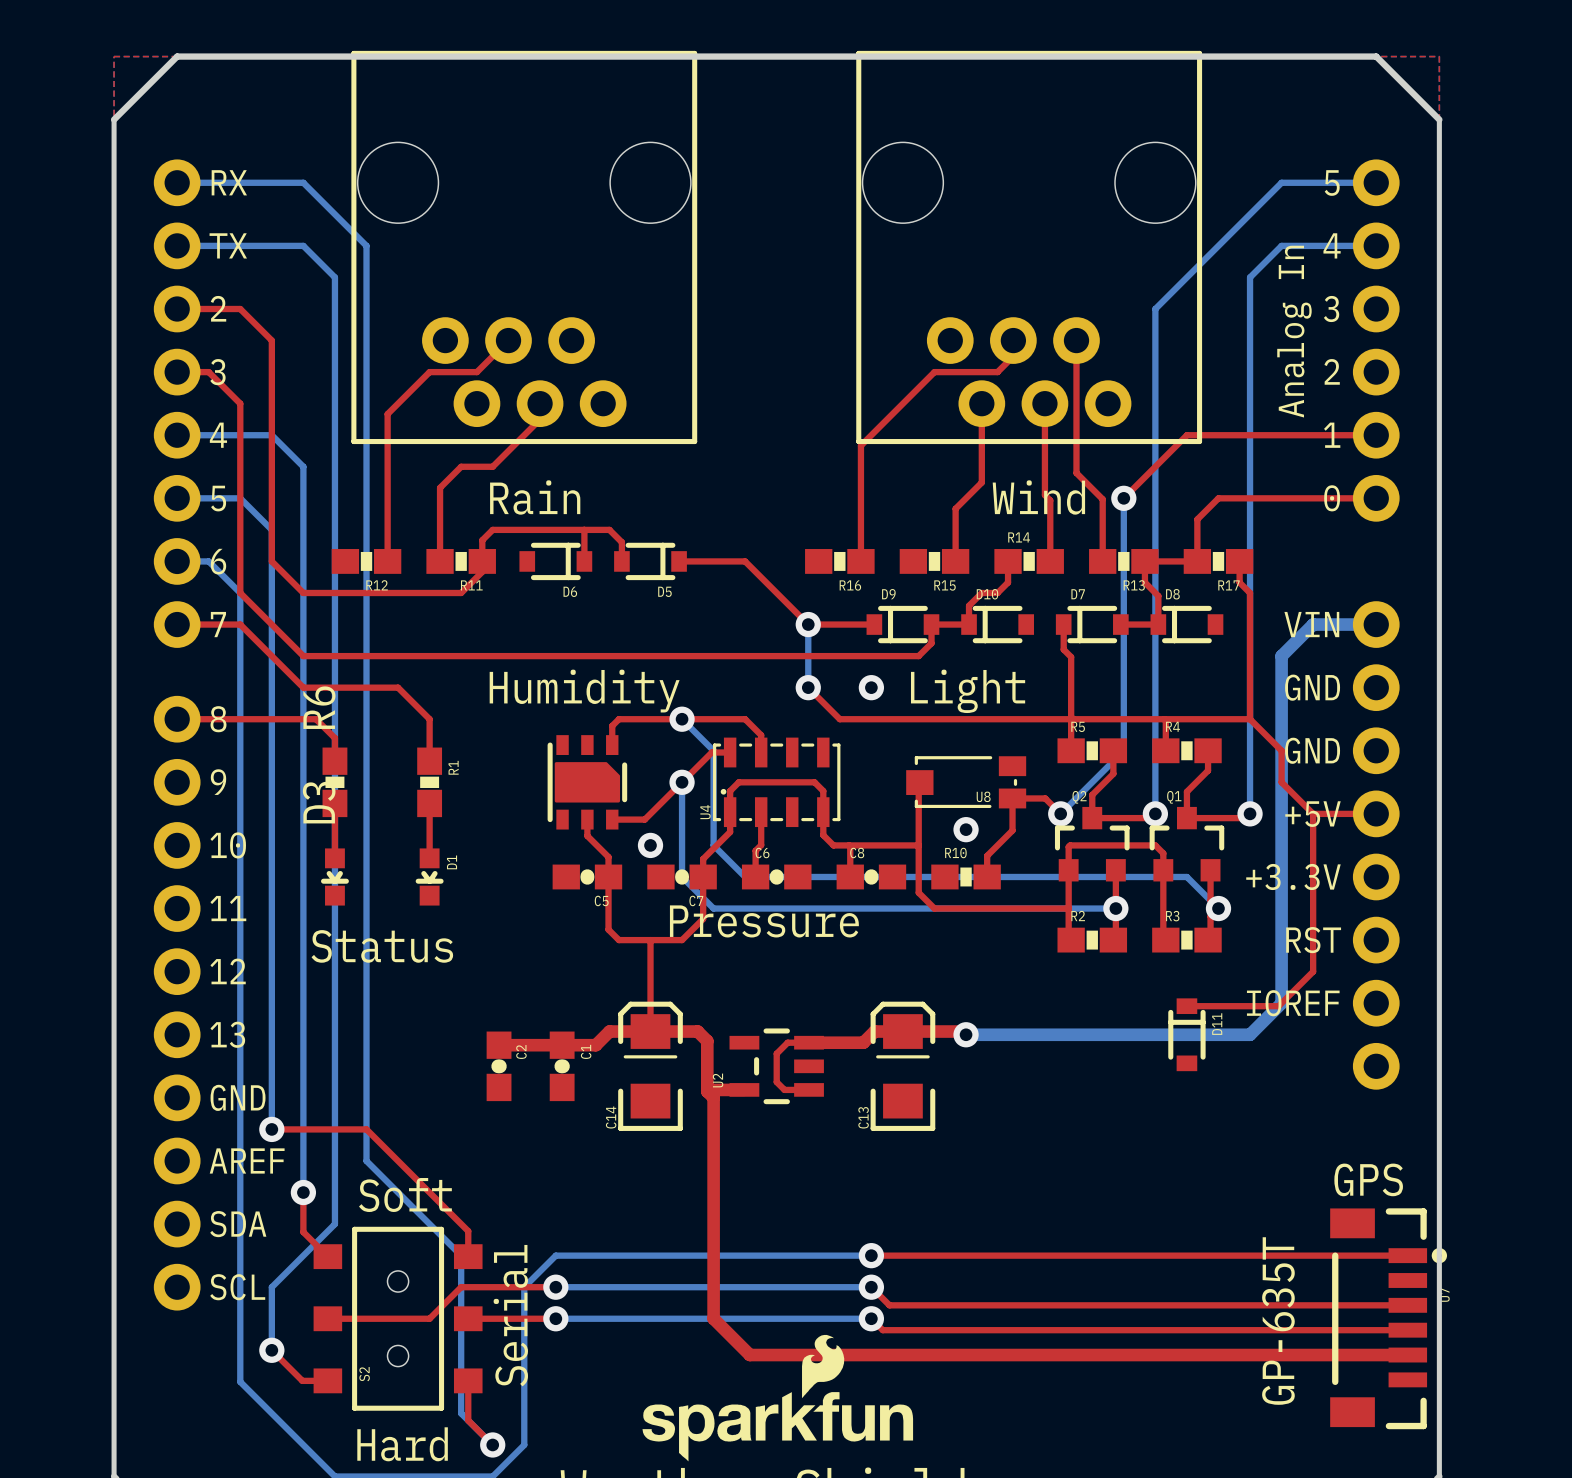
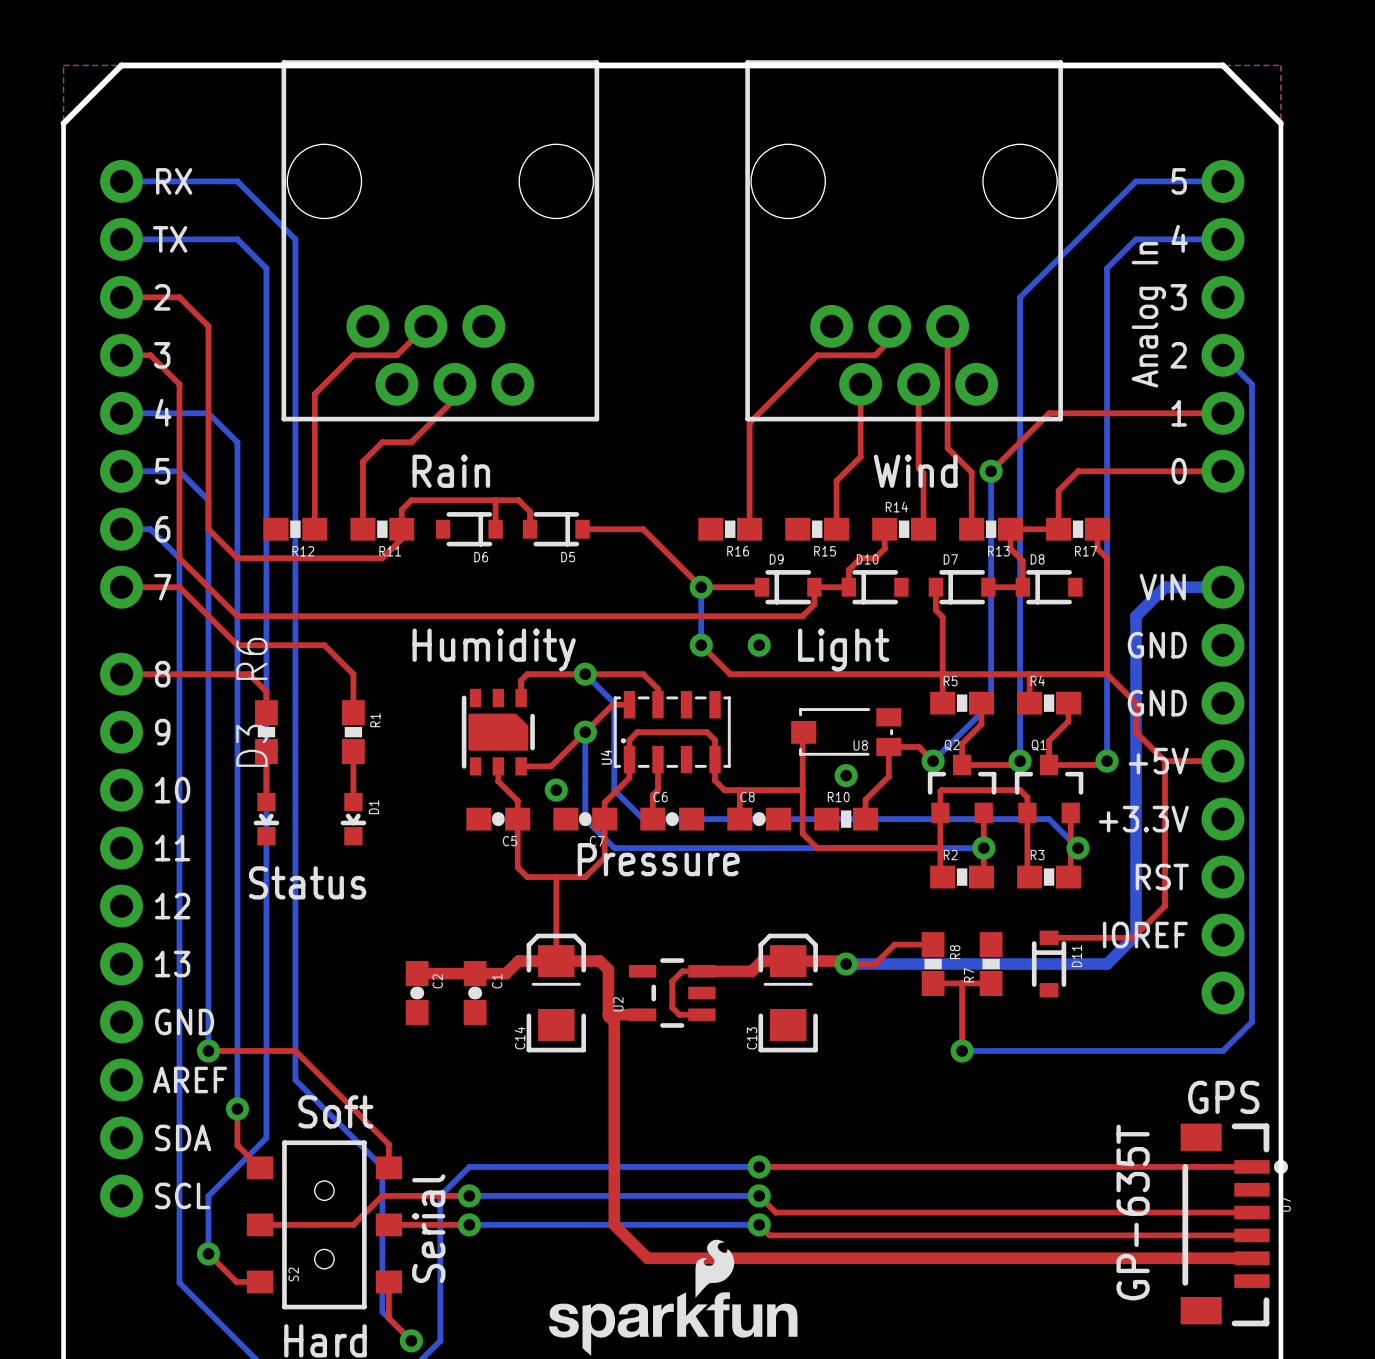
bottom track: none -> (1222, 355) (1251, 384) (1251, 1022) (1222, 1050) (962, 1050)
top track: none -> (933, 944) (894, 944) (875, 964) (846, 964)
R8: none -> (933, 964)
R7: none -> (991, 964)
top track: none -> (933, 983) (991, 983)
top track: none -> (962, 983) (962, 1050)
via: none -> (962, 1050)

